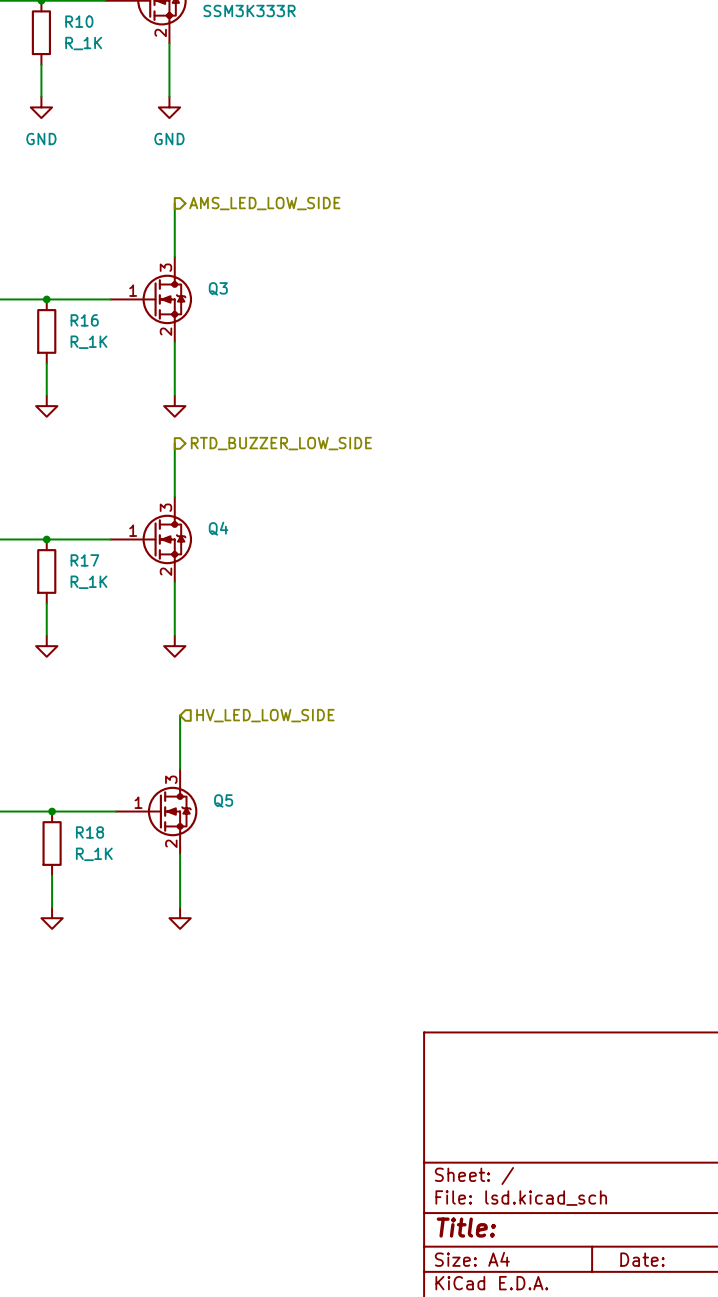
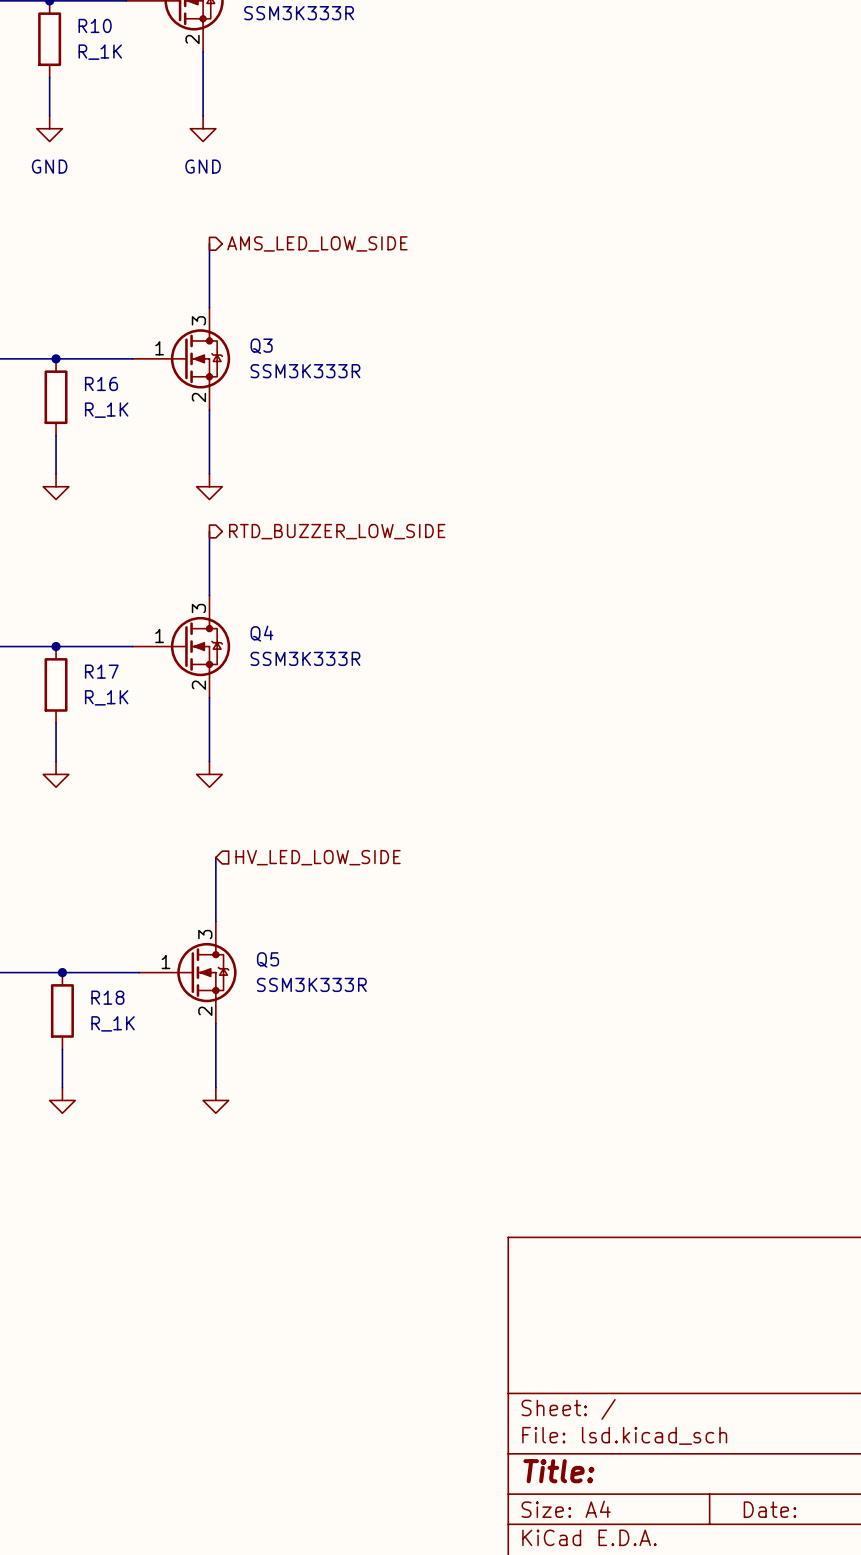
Q3 value: none -> SSM3K333R (305, 371)
Q4 value: none -> SSM3K333R (305, 658)
Q5 value: none -> SSM3K333R (311, 984)

